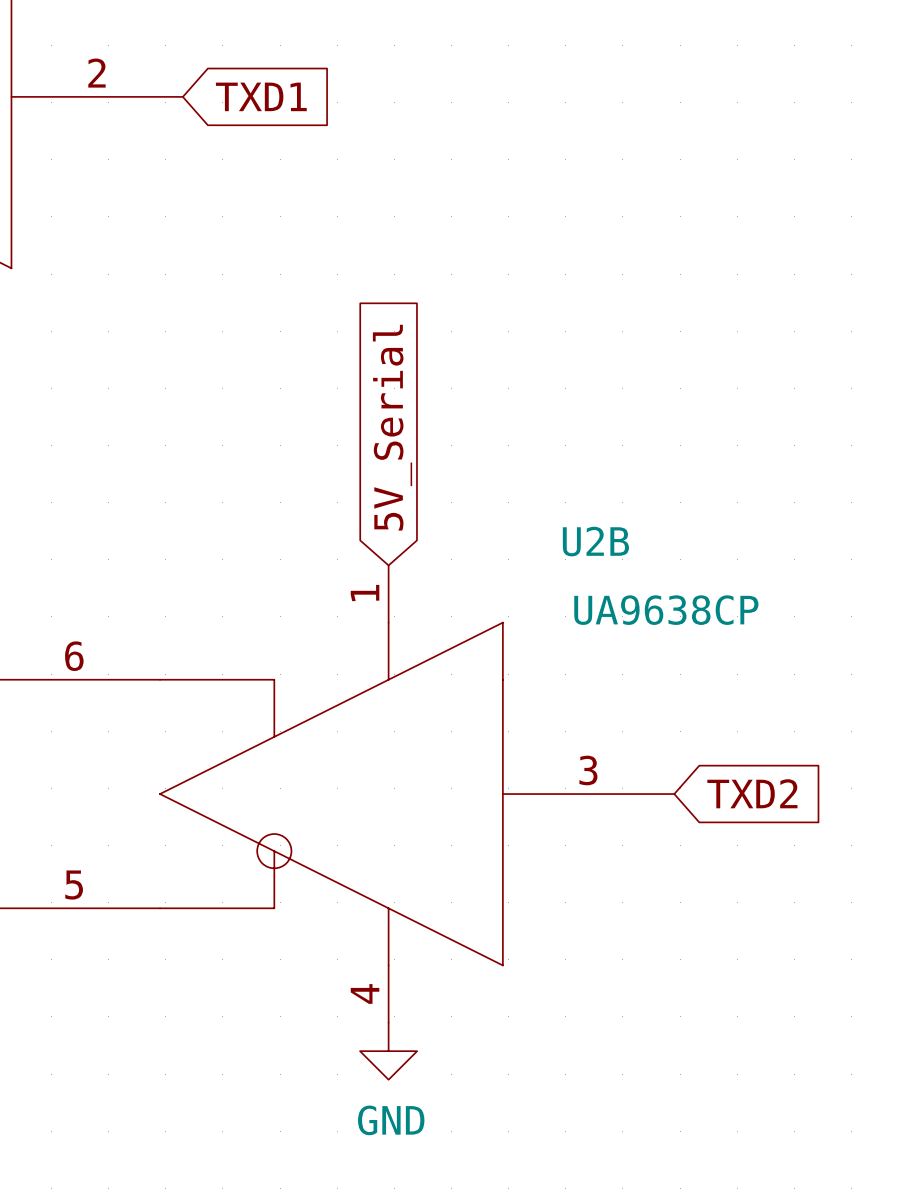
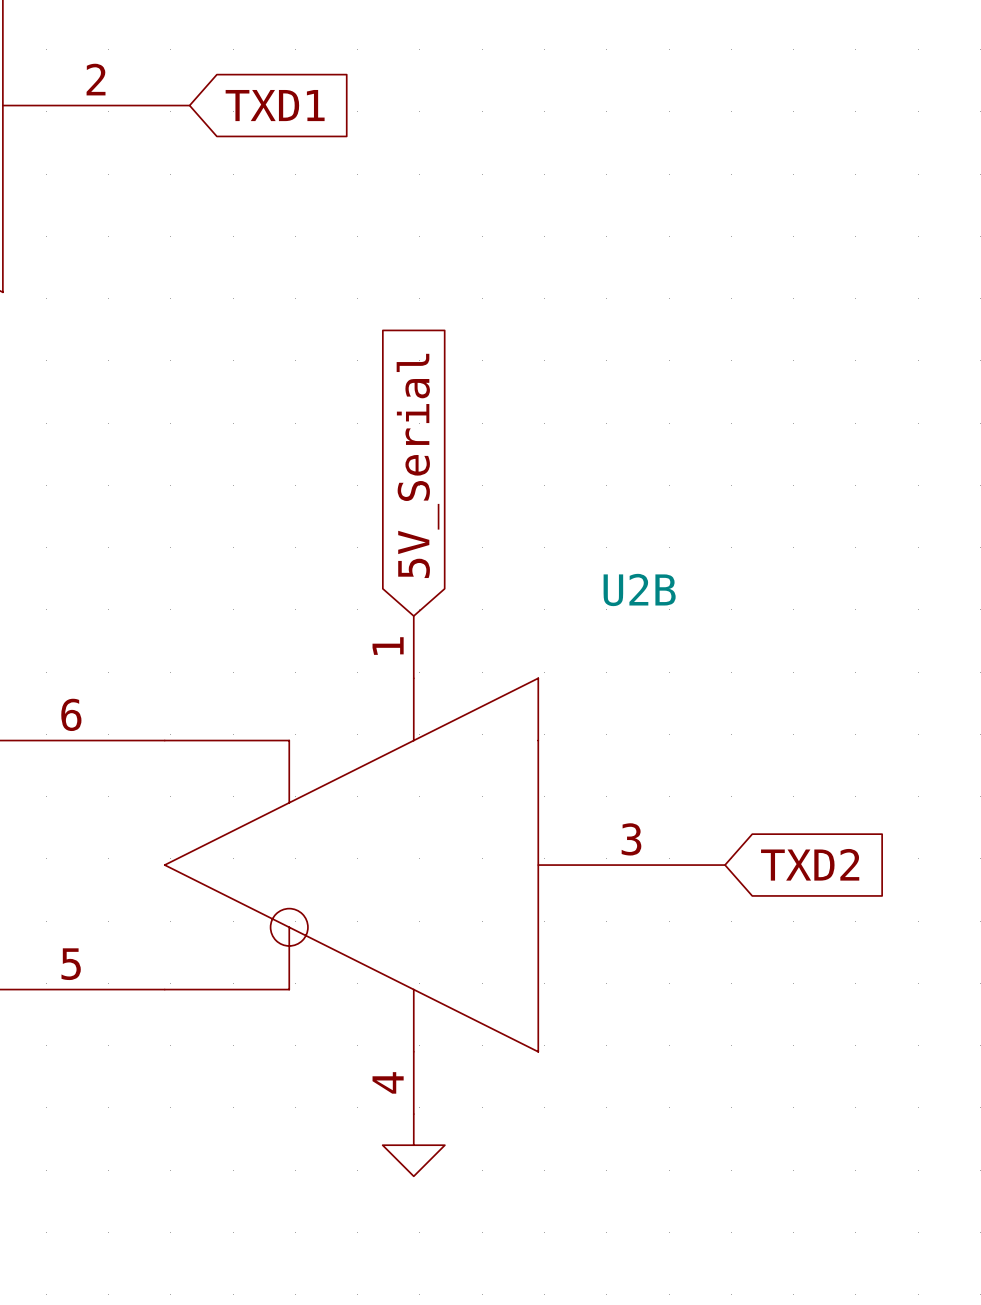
U2B value: UA9638CP (666, 610) -> none
power symbol text: GND (391, 1120) -> none

